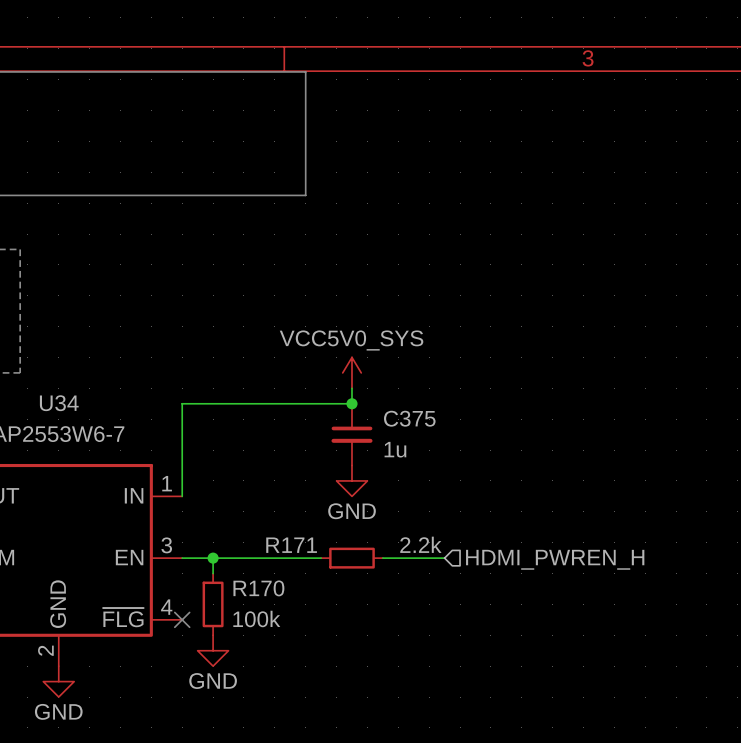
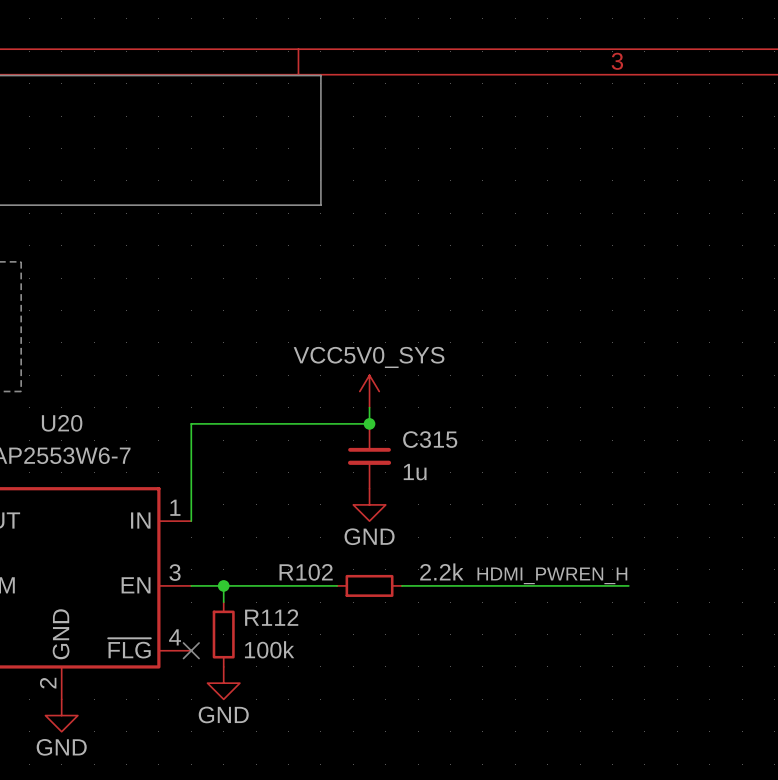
U34 name: U34 (59, 403) -> U20 (62, 423)
C375 name: C375 (409, 418) -> C315 (430, 439)
R171 name: R171 (291, 545) -> R102 (306, 572)
label: none -> HDMI_PWREN_H (552, 575)
wire: none -> (466, 585) (628, 585)
hierarchical label: HDMI_PWREN_H (555, 559) -> none
R170 name: R170 (258, 588) -> R112 (271, 617)

